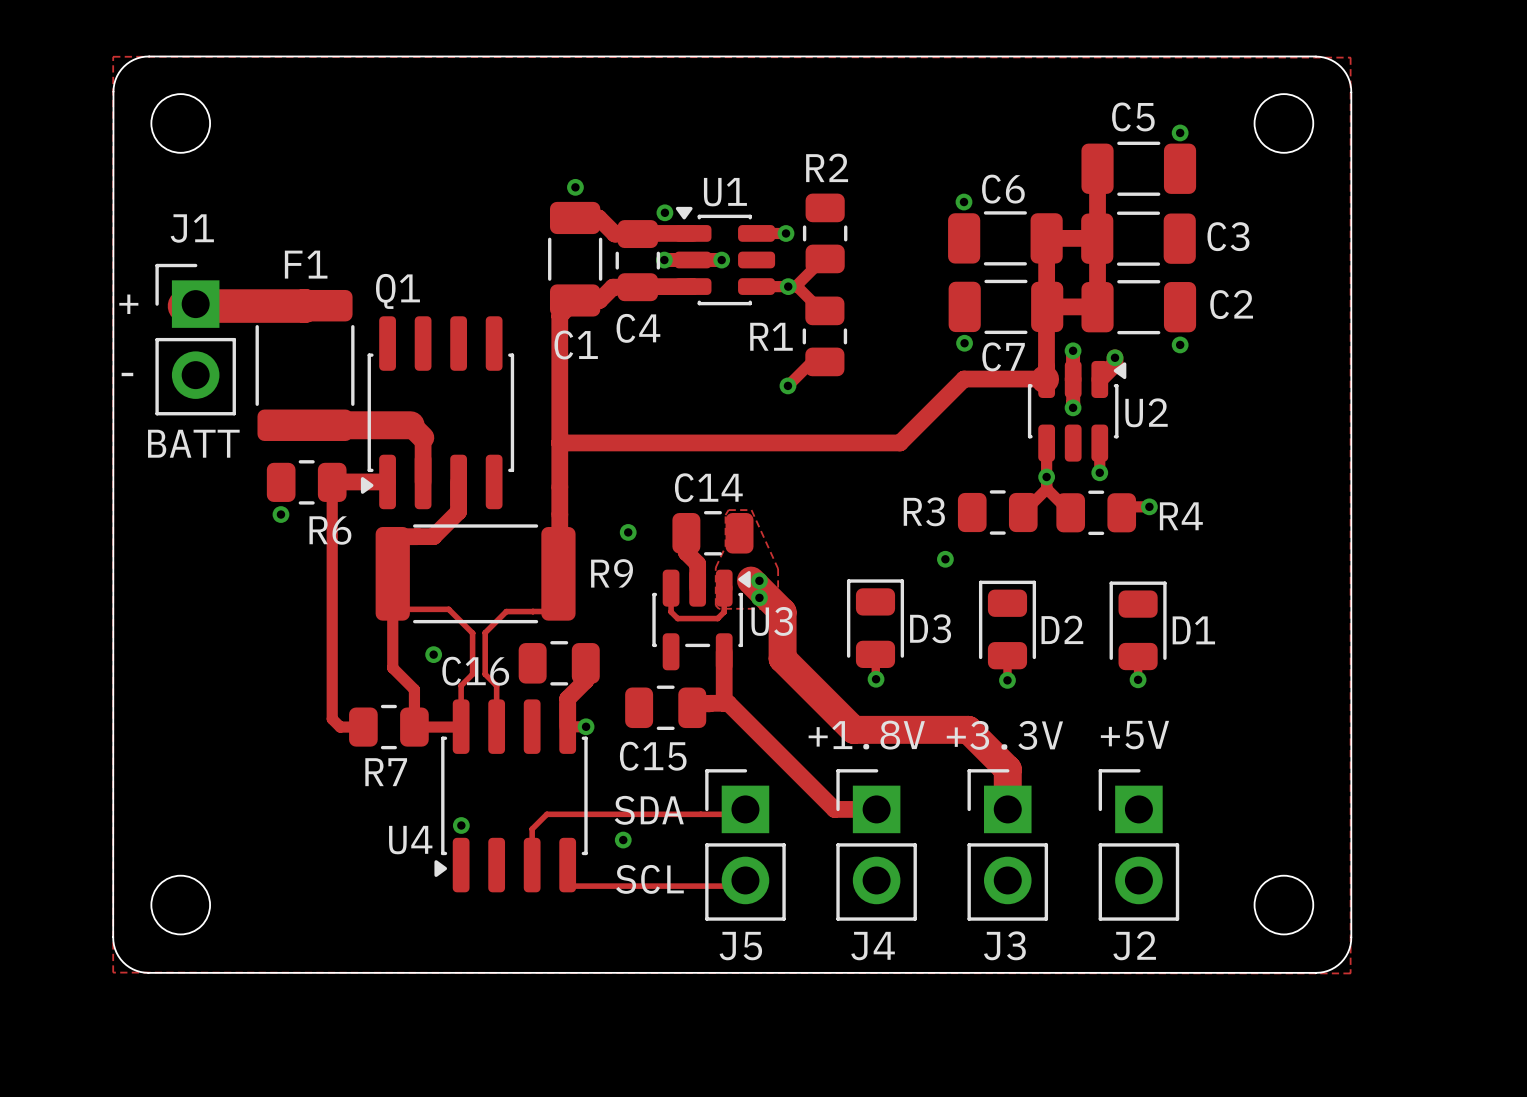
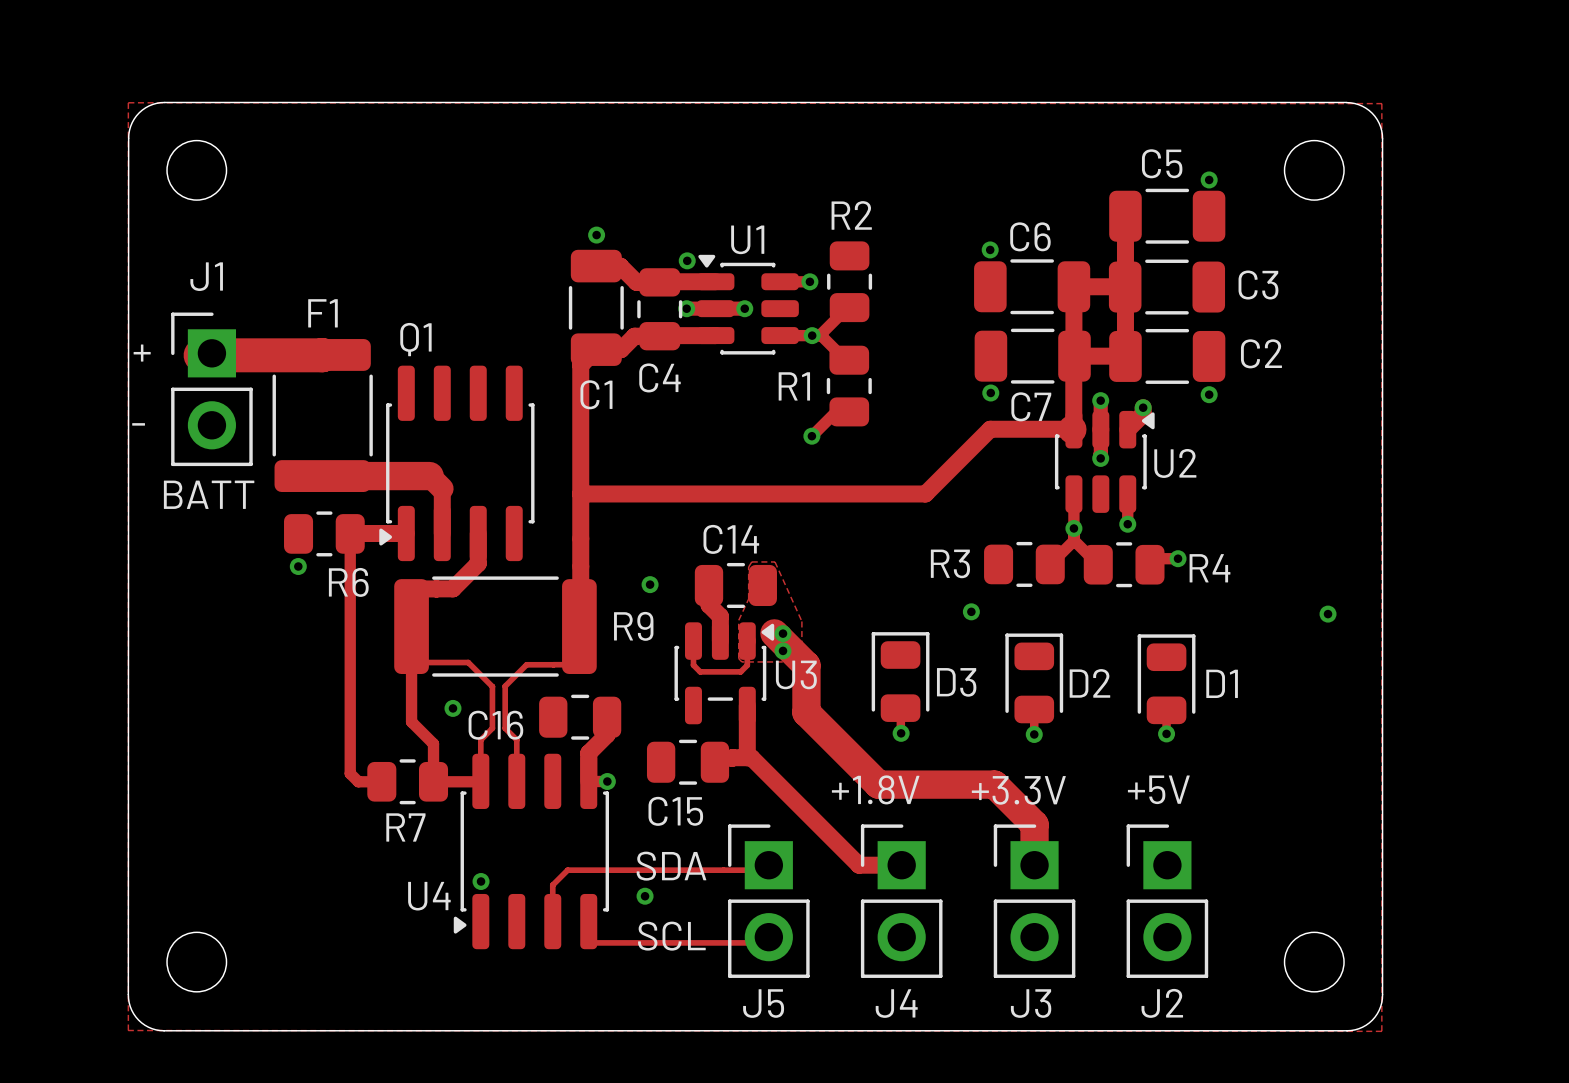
via: none -> (1328, 614)

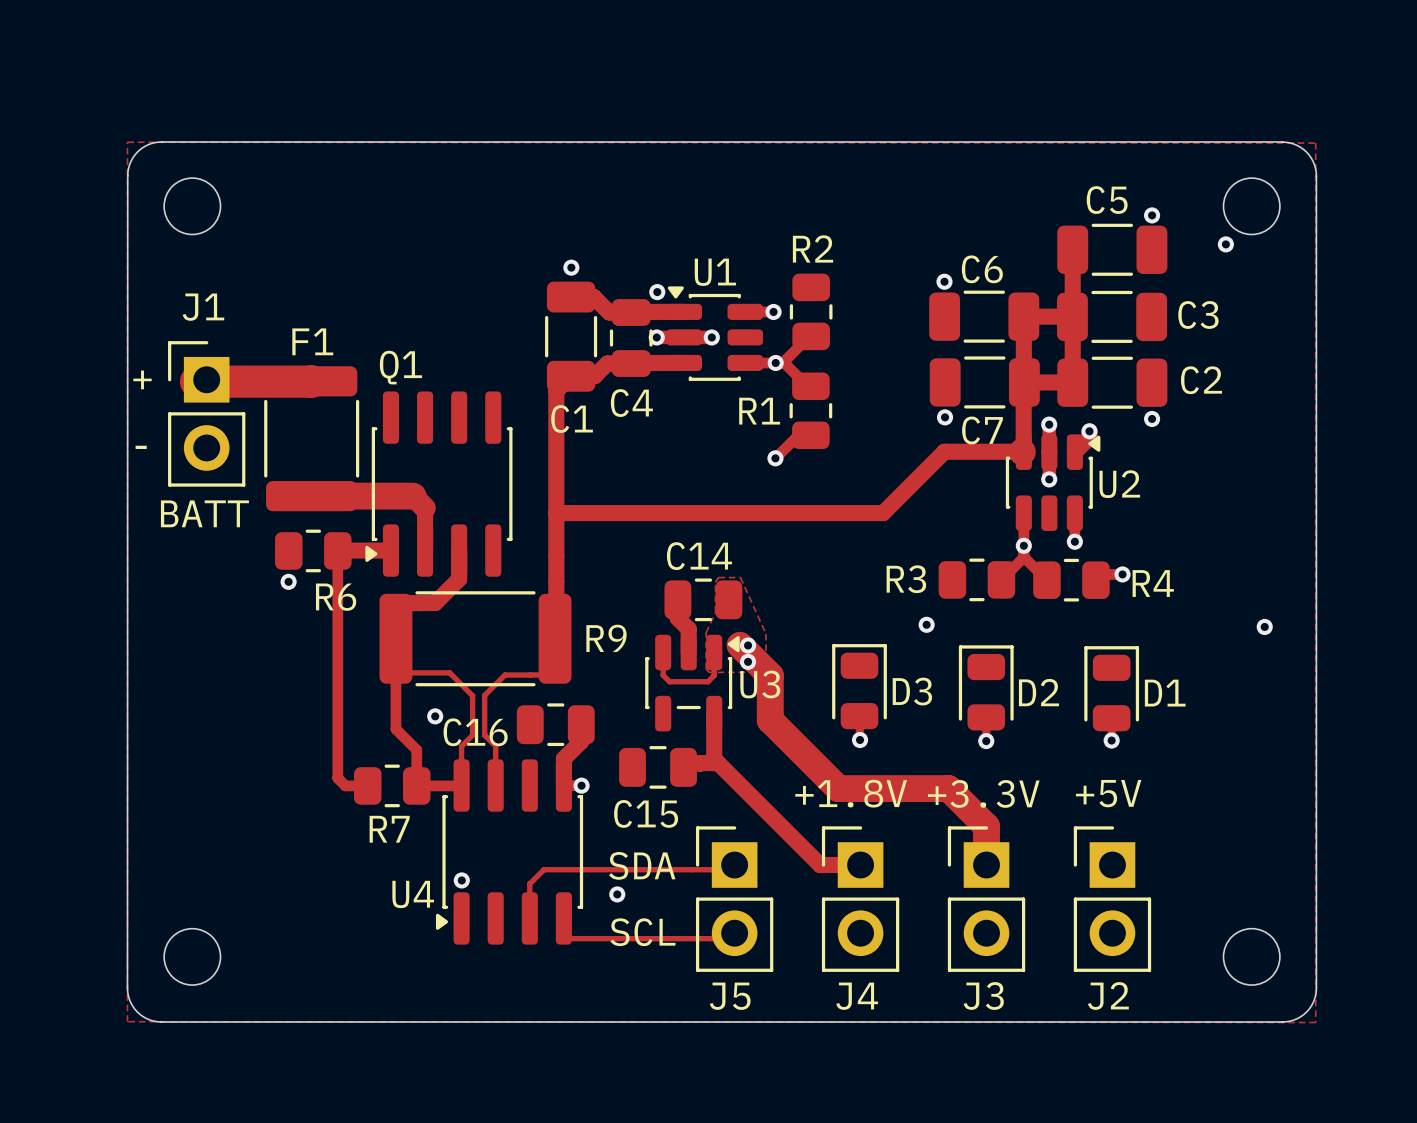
via: none -> (1225, 244)
via: (650, 584) -> none

